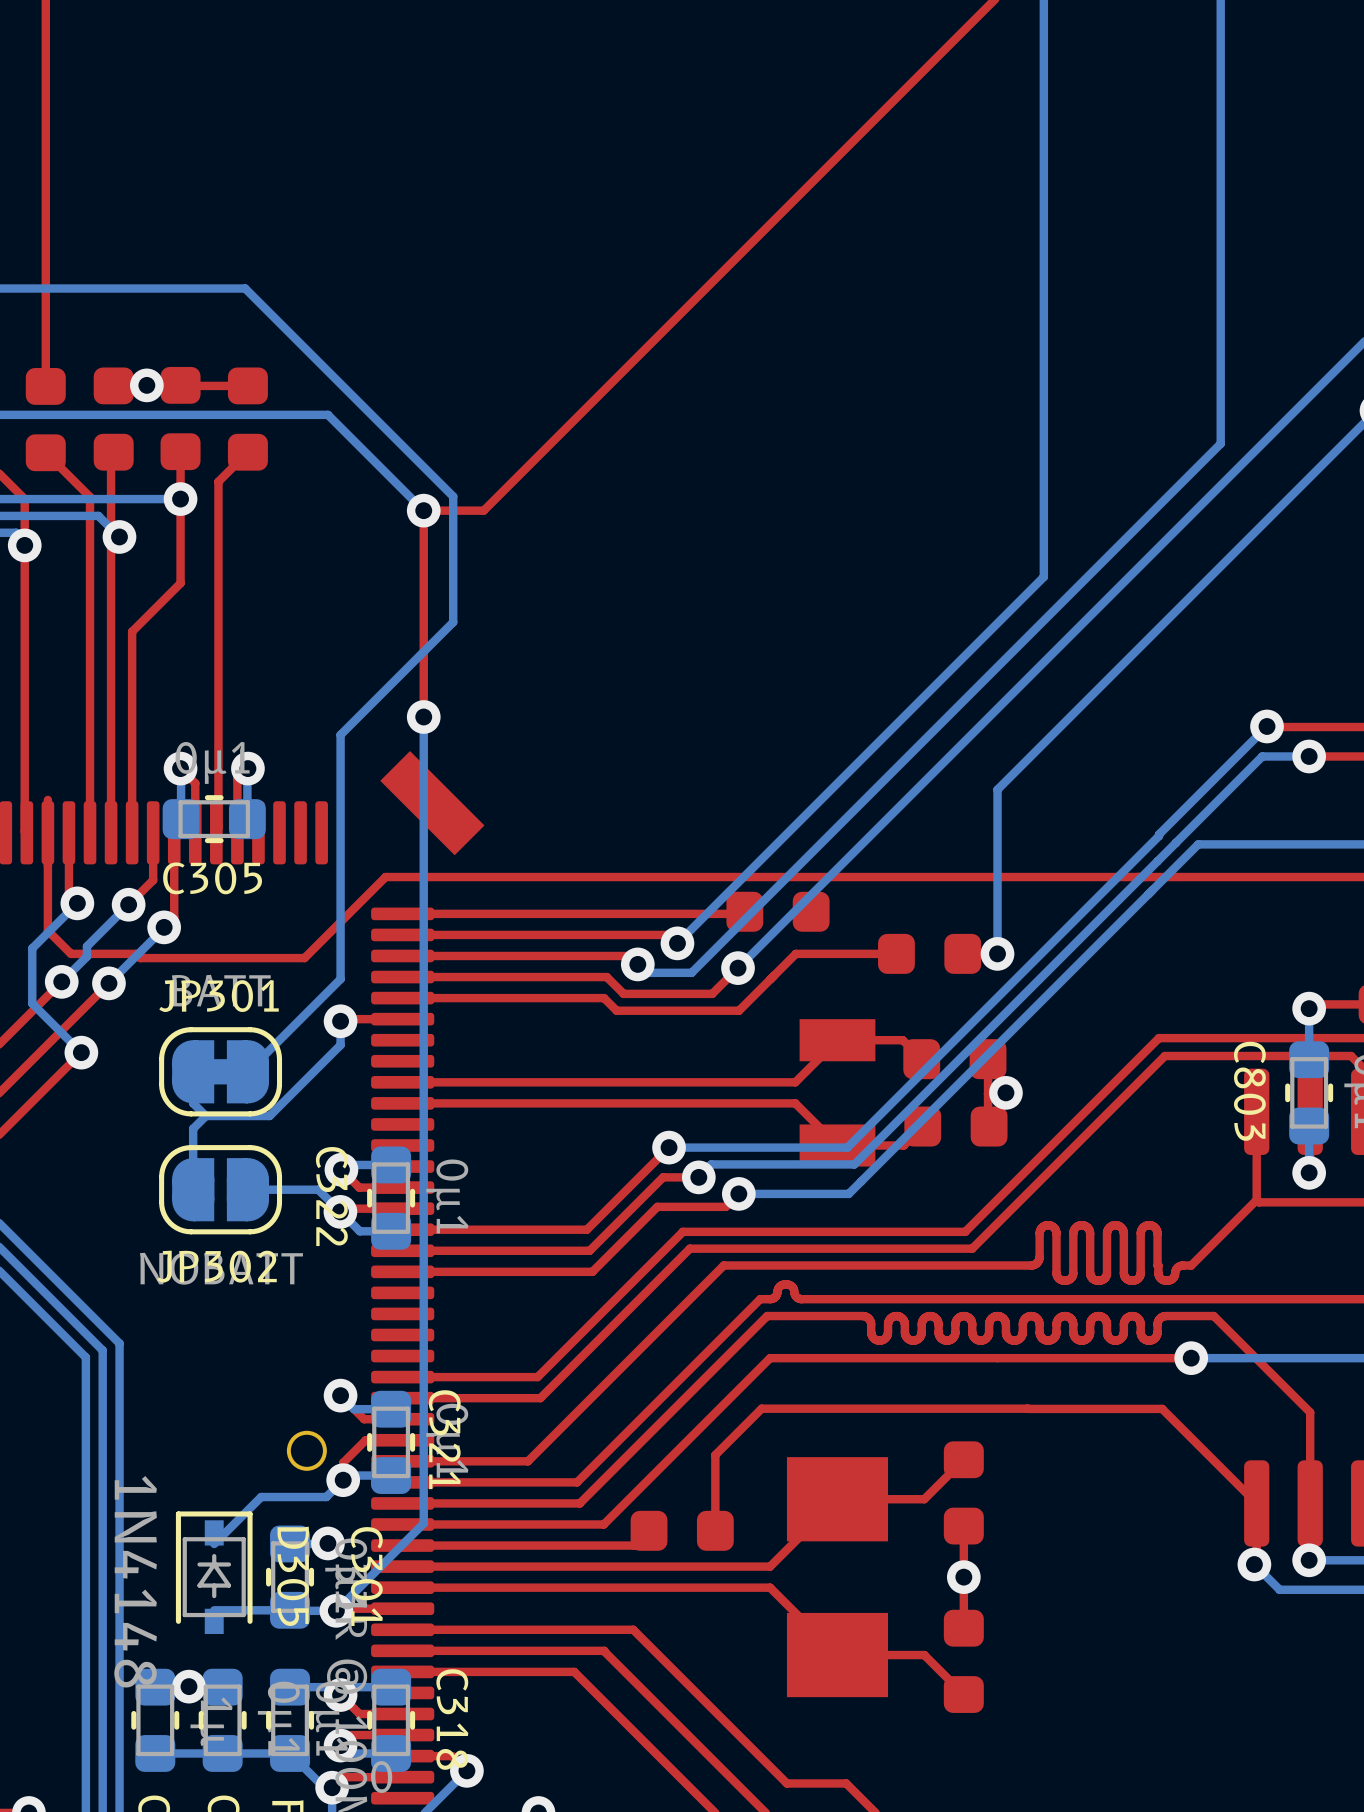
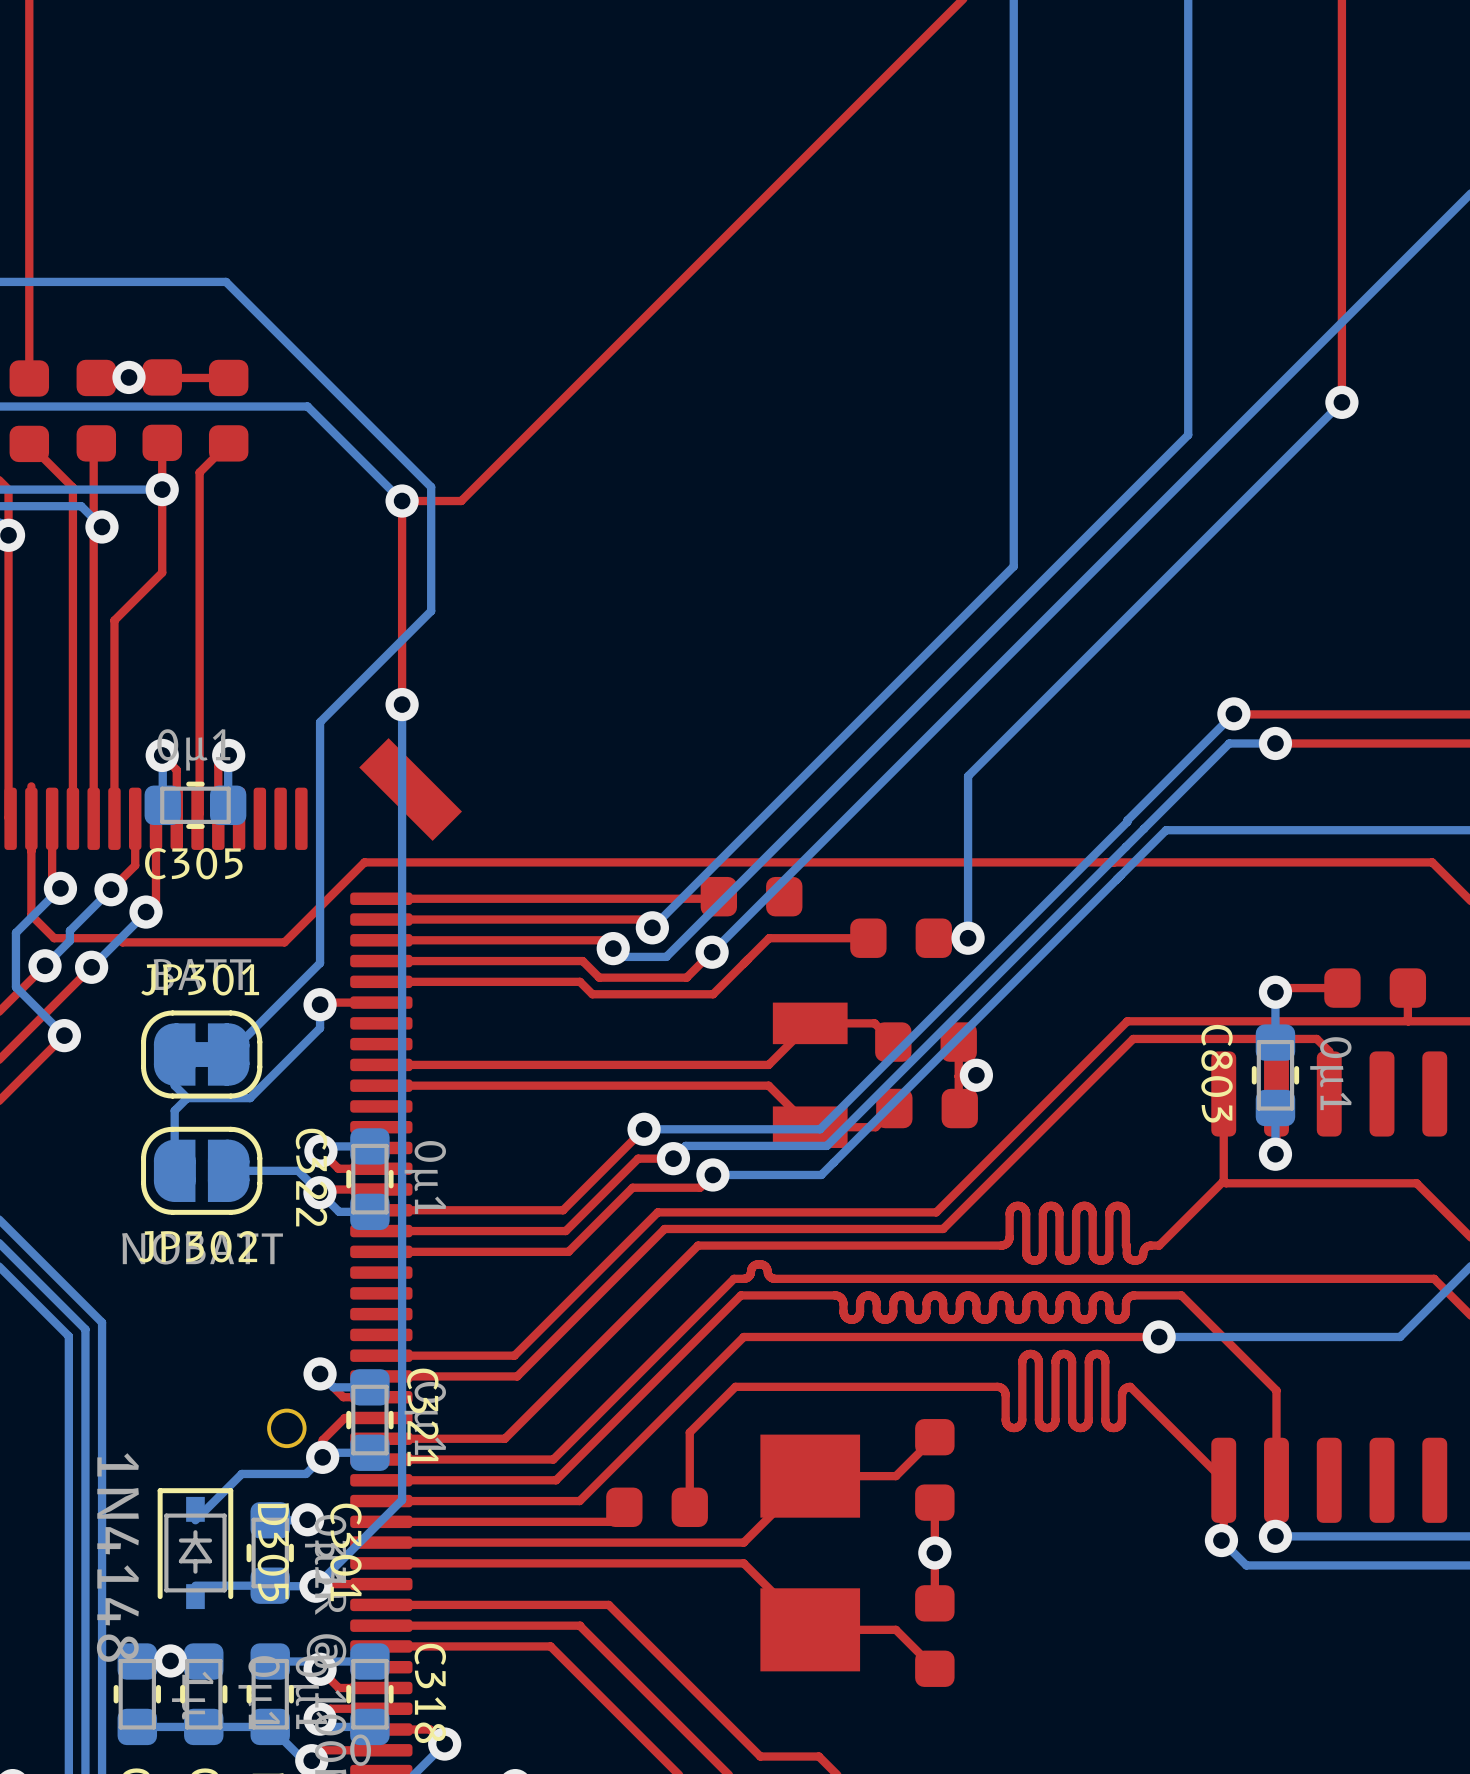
top track: (1162, 1408) (1029, 1408) -> (1130, 1386) (1125, 1388) (1122, 1393) (1121, 1423) (1113, 1428) (1108, 1426) (1105, 1421) (1105, 1362) (1100, 1354) (1093, 1354) (1088, 1360) (1088, 1419) (1086, 1424) (1082, 1427) (1075, 1426) (1072, 1421) (1072, 1362) (1067, 1354) (1060, 1354) (1055, 1360) (1055, 1419) (1050, 1427) (1043, 1427) (1039, 1421) (1038, 1362) (1035, 1355) (1028, 1354) (1022, 1360) (1022, 1419) (1017, 1427) (1012, 1427) (1006, 1423) (1005, 1393) (999, 1387)

